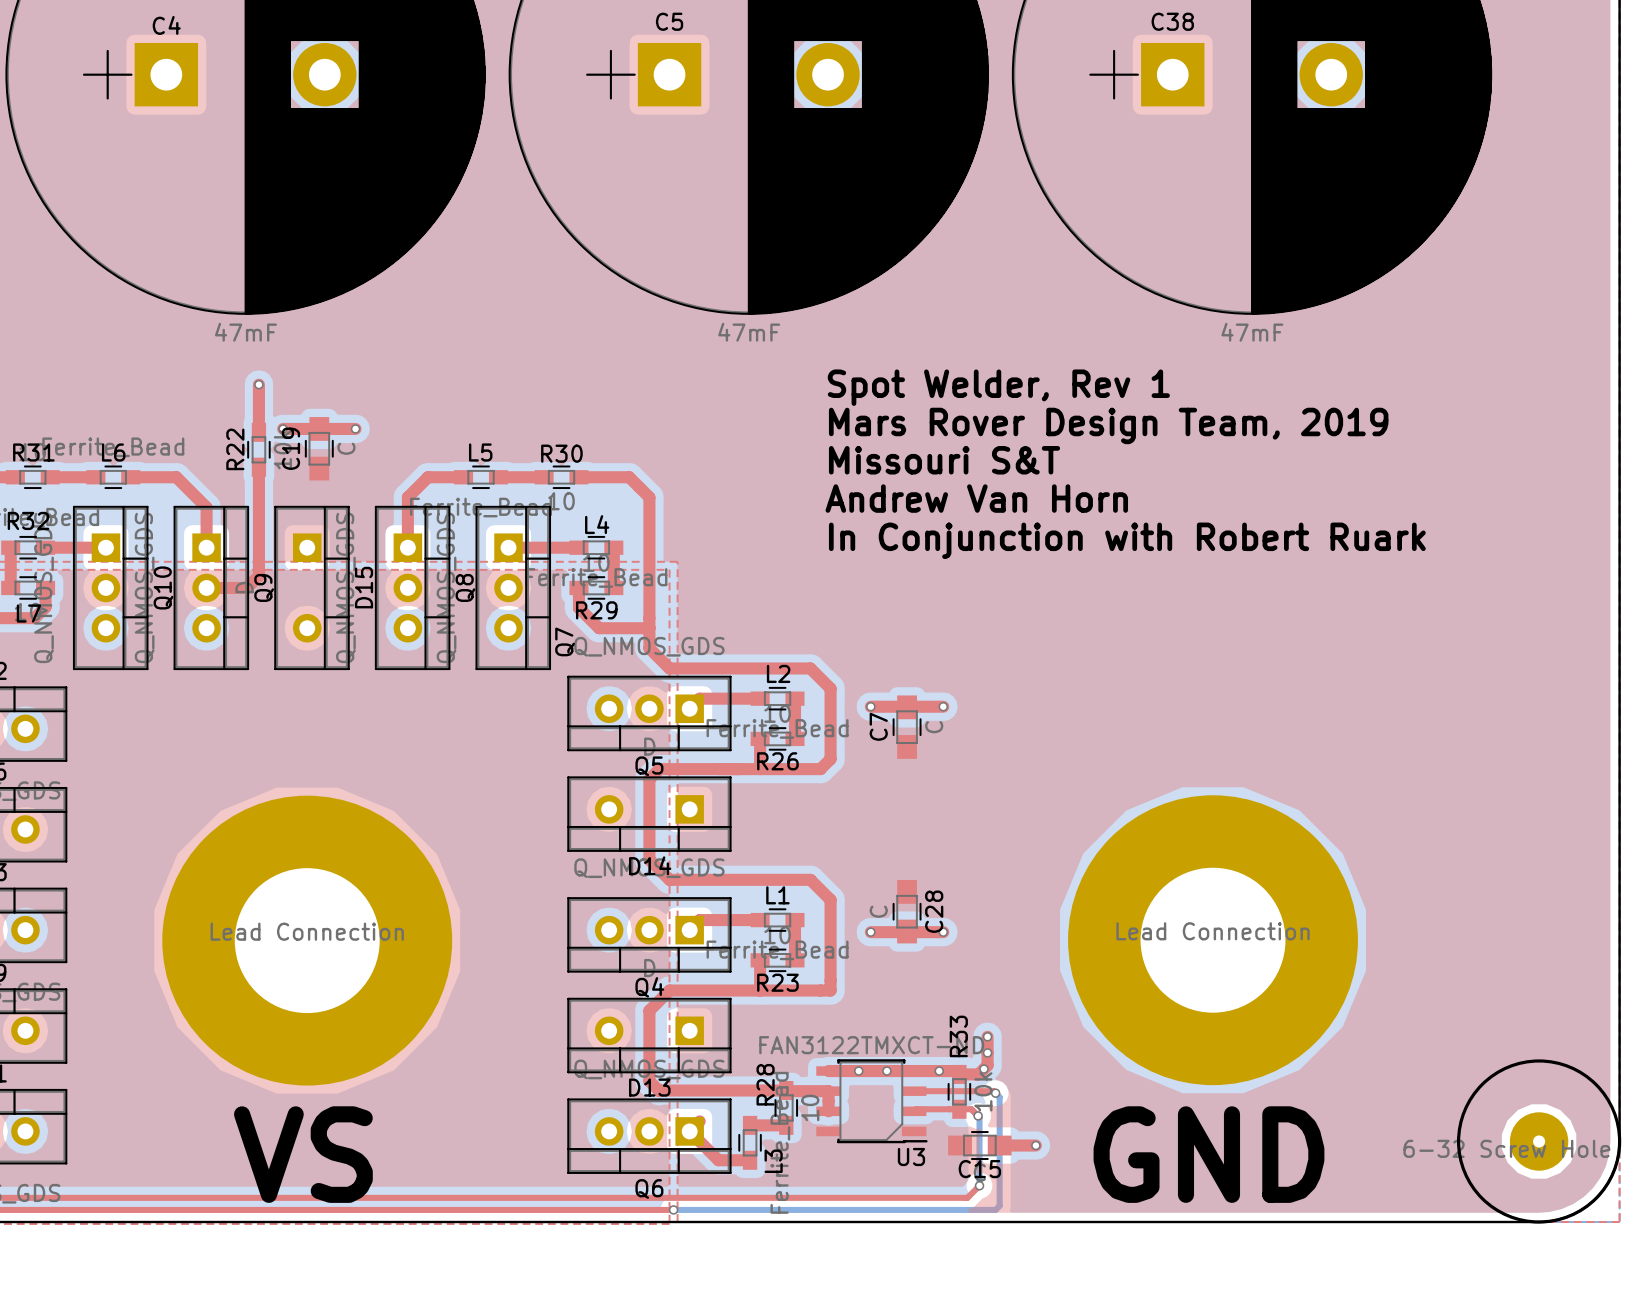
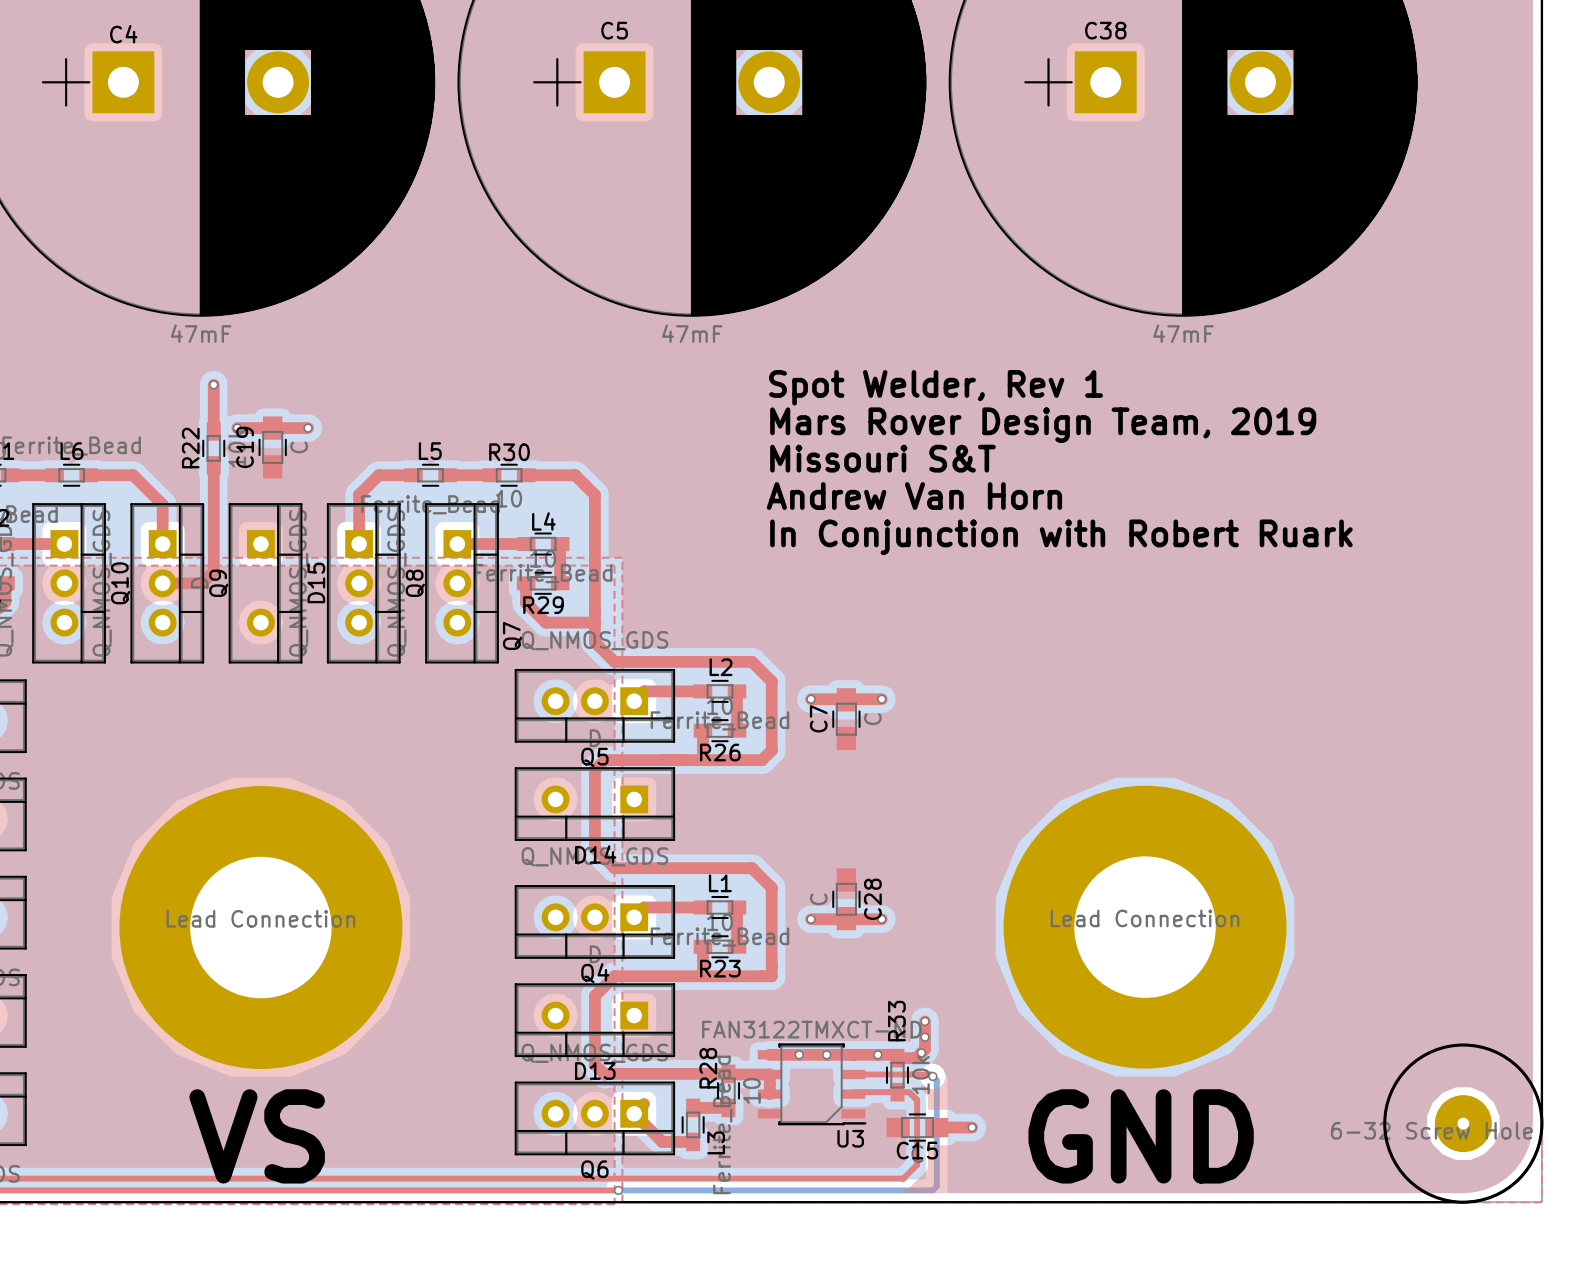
bottom track: (978, 1115) (979, 1185) -> none
via: (978, 1115) -> none
top track: (979, 1185) (965, 1197) -> (917, 1100) (917, 1164) (903, 1178)
via: (979, 1185) -> none

